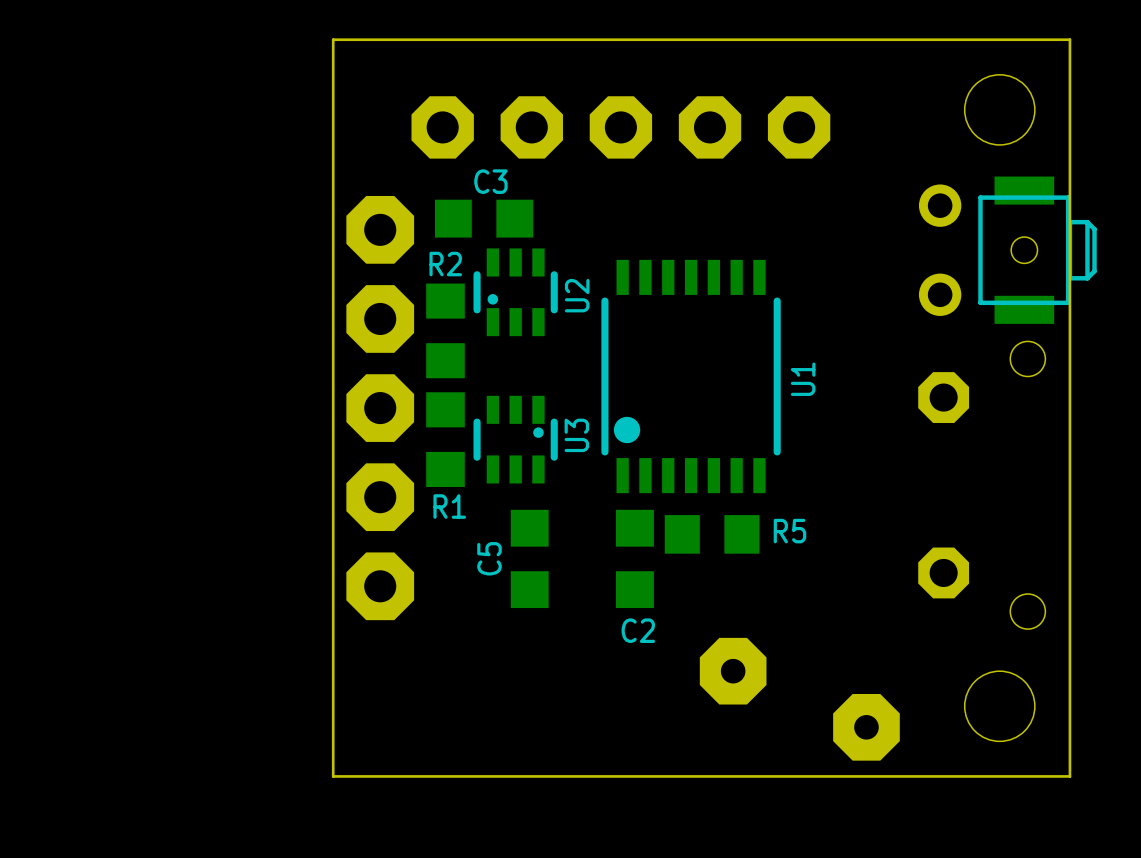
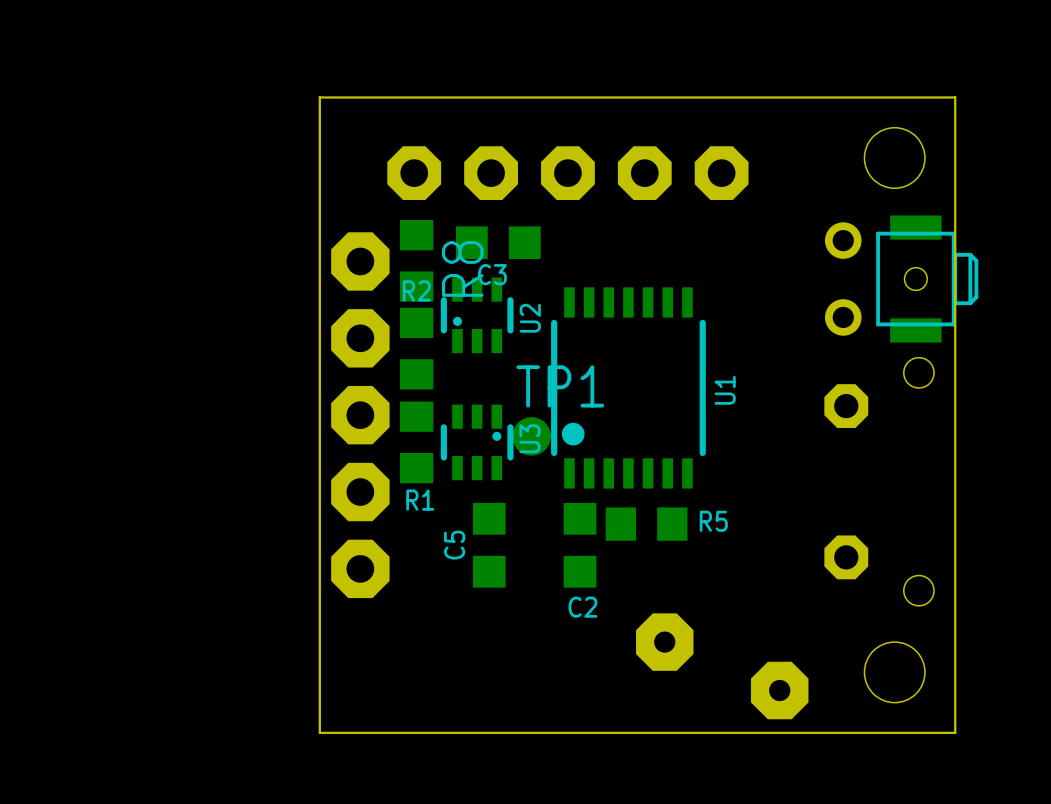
C3 name position: C3 (490, 181) -> C3 (492, 274)
C3 position: (484, 218) -> (498, 242)
R8: none -> (416, 260)
TP1: none -> (531, 436)

